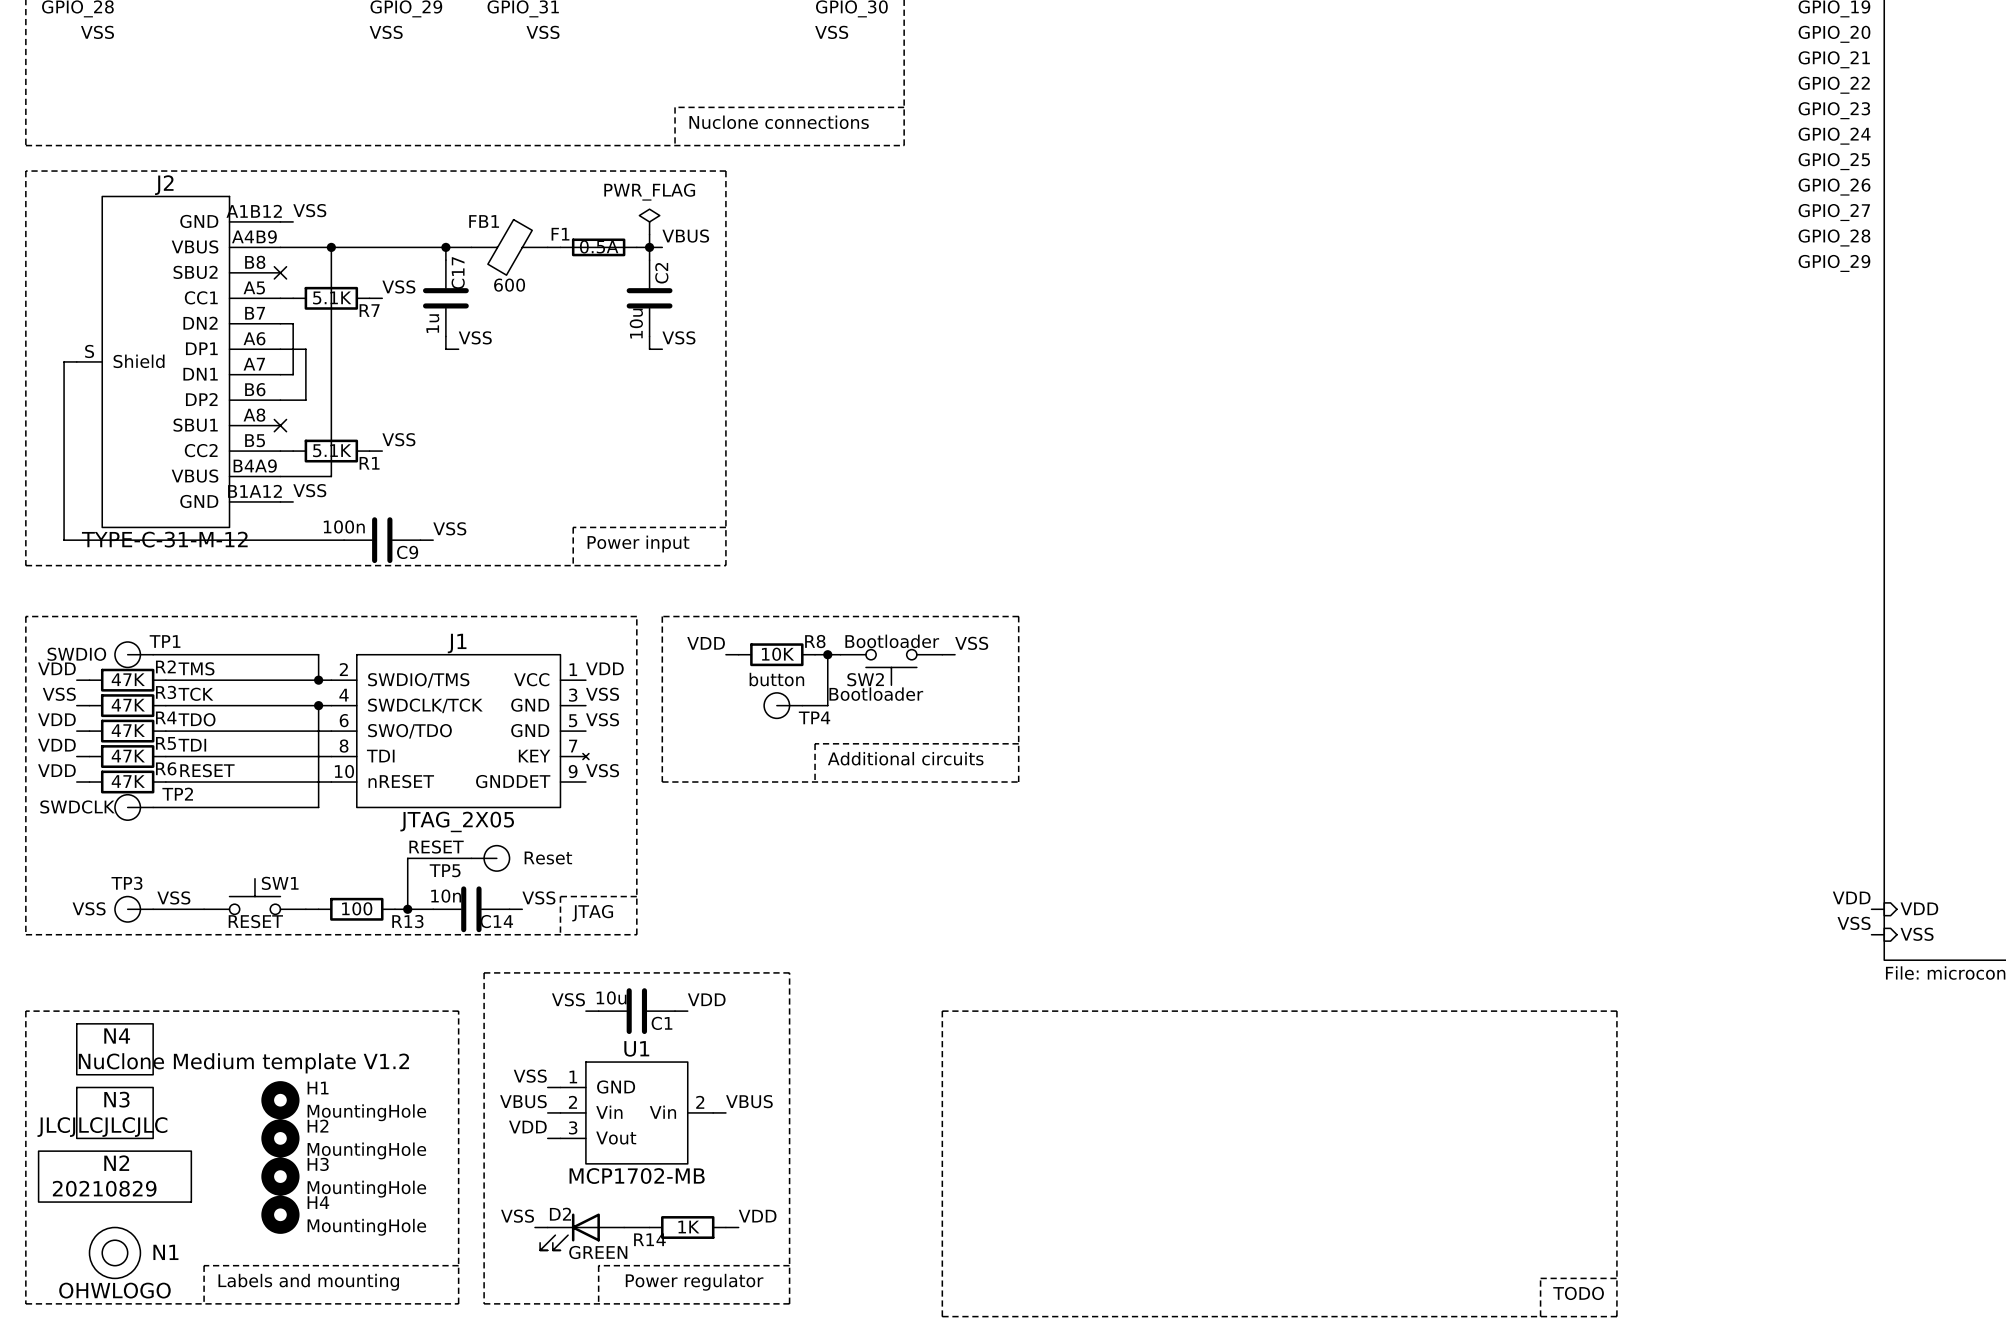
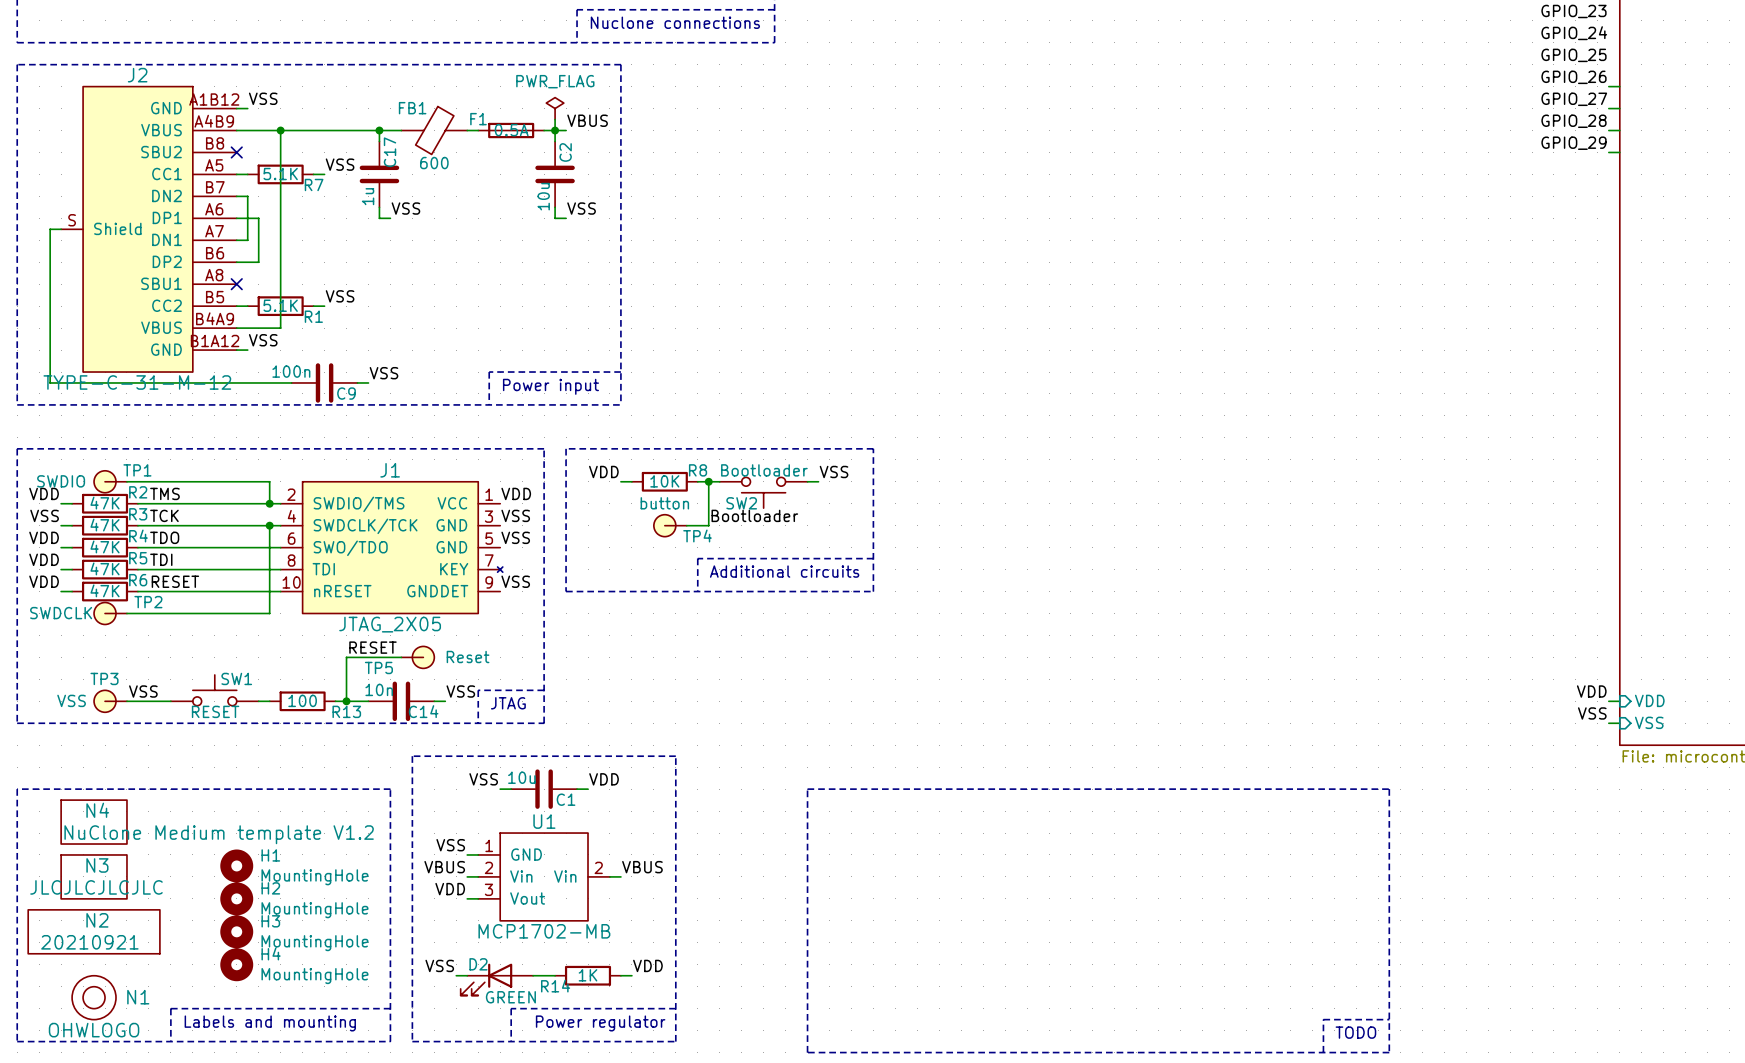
wire: none -> (1608, 86) (1619, 86)
wire: none -> (1608, 108) (1619, 108)
wire: none -> (1608, 130) (1619, 130)
wire: none -> (1608, 152) (1619, 152)
N2 value: 20210829 (104, 1188) -> 20210921 (89, 942)

